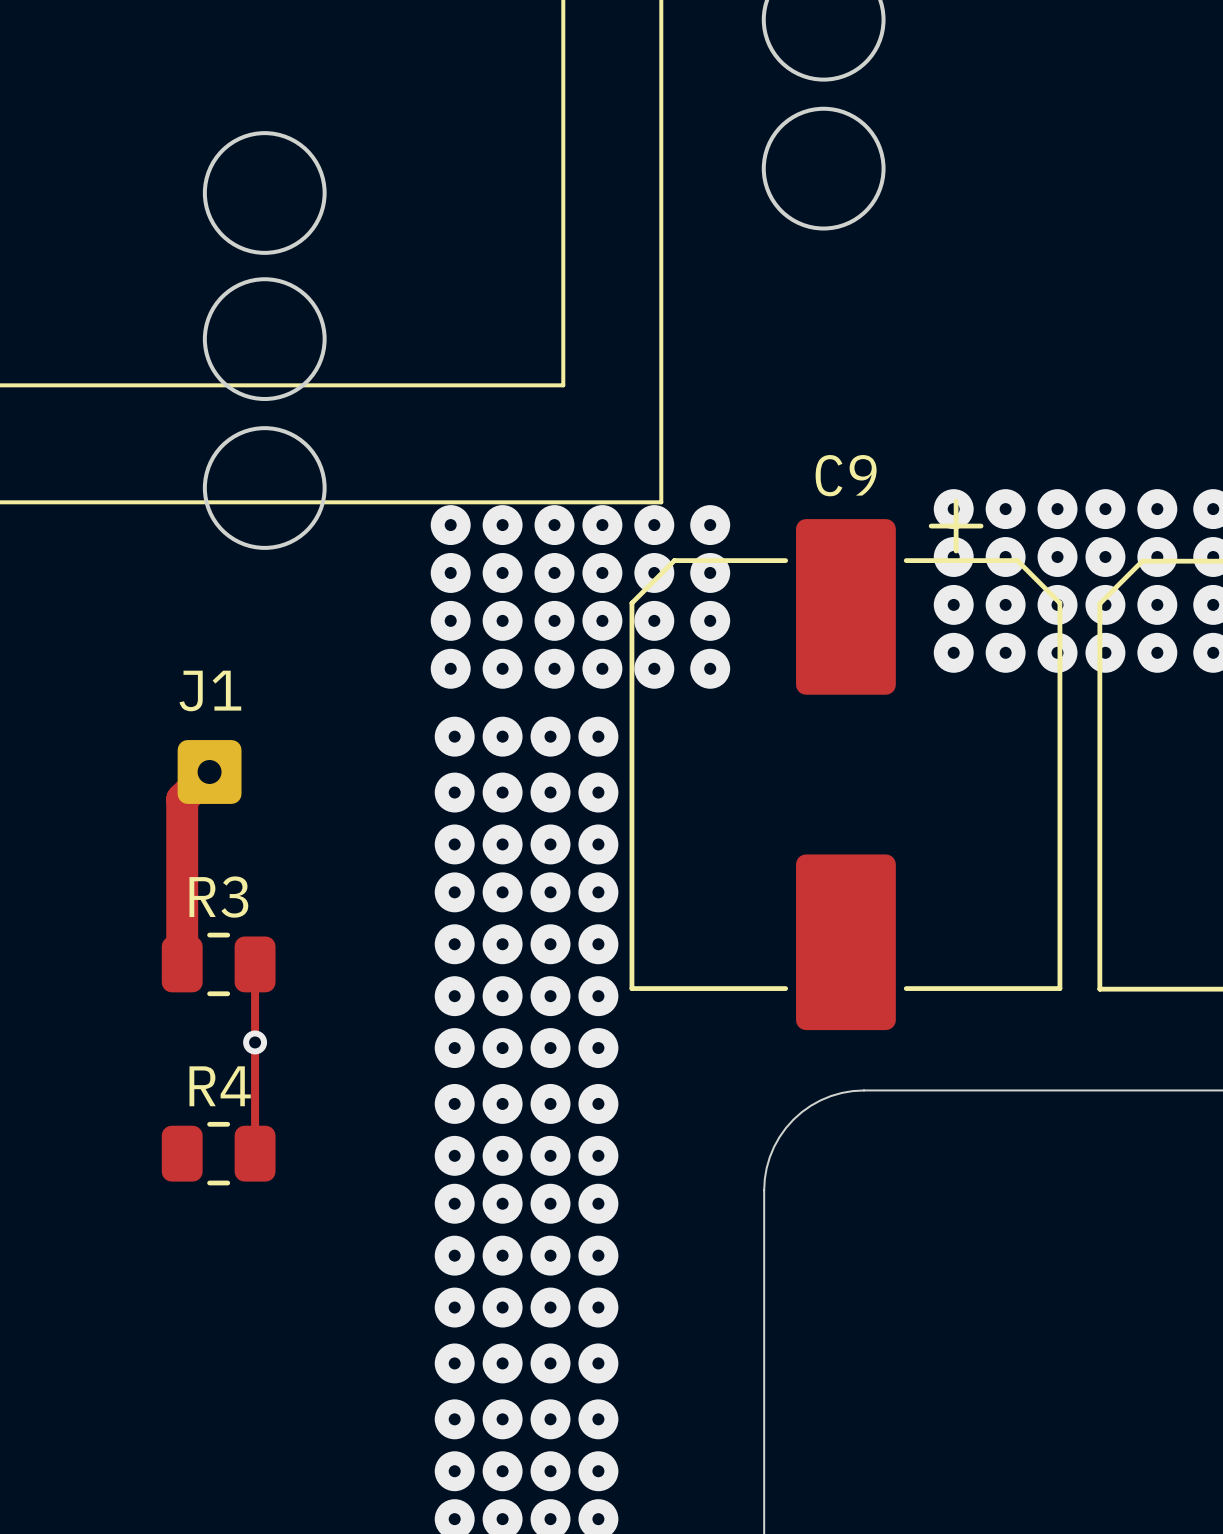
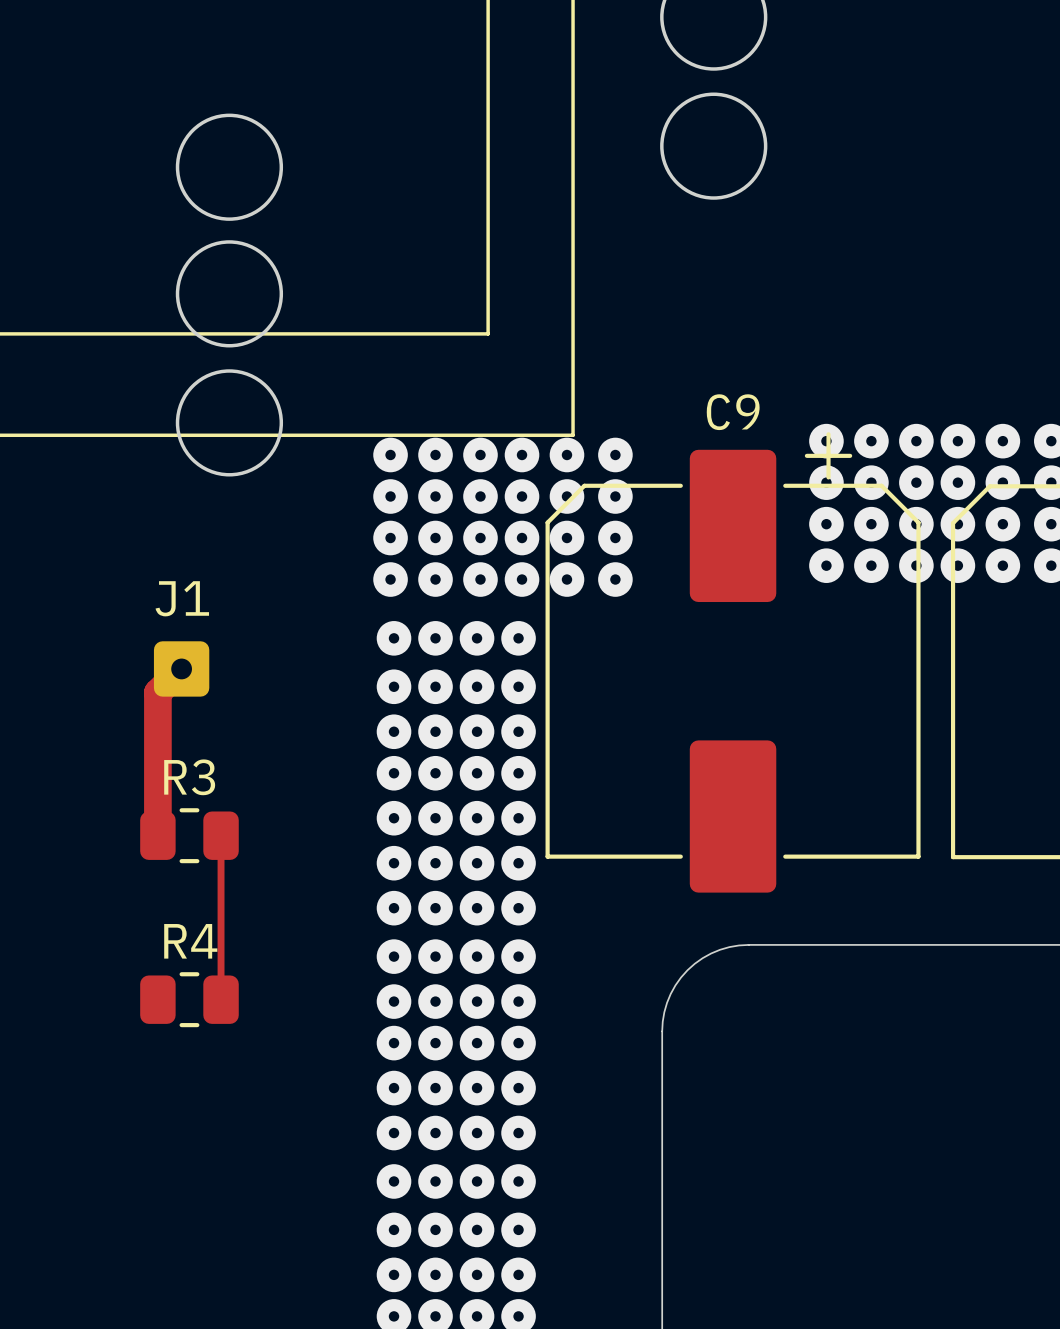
via: (255, 1042) -> none

